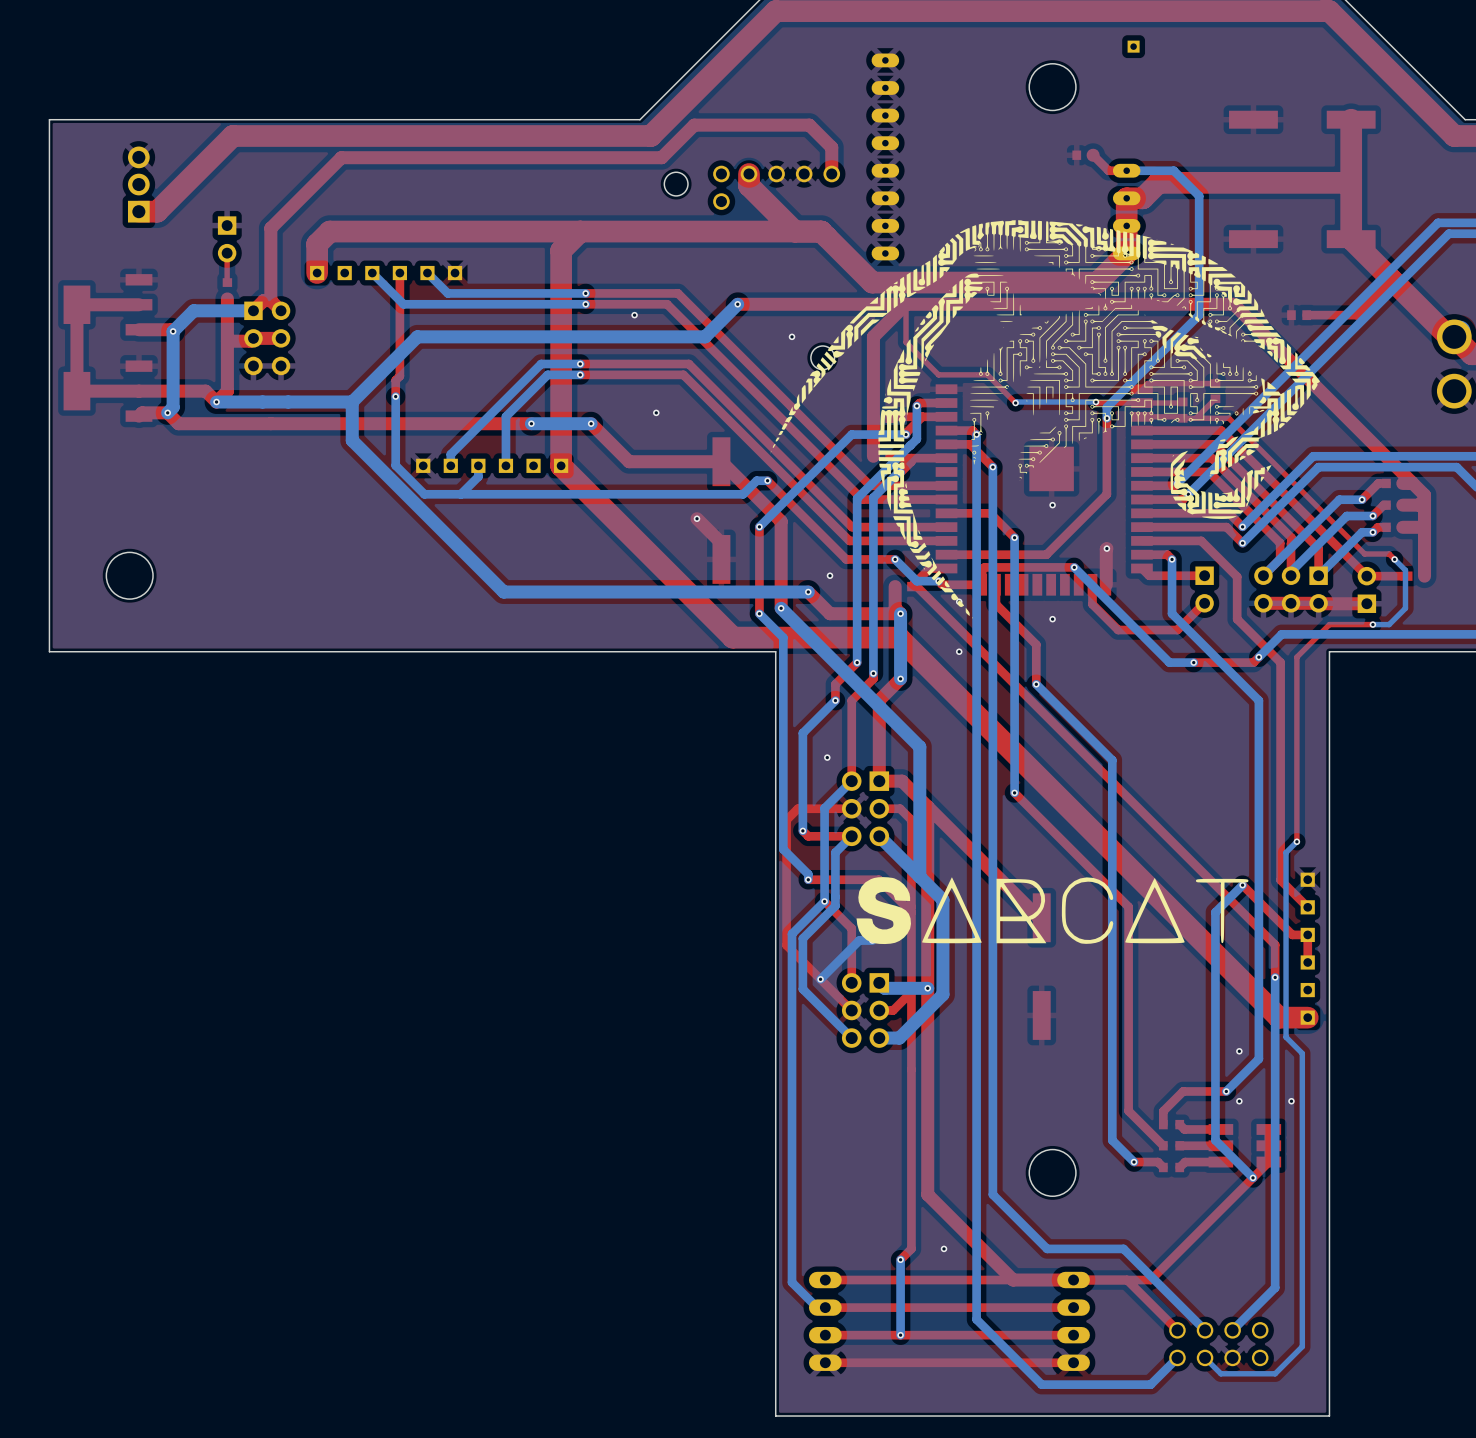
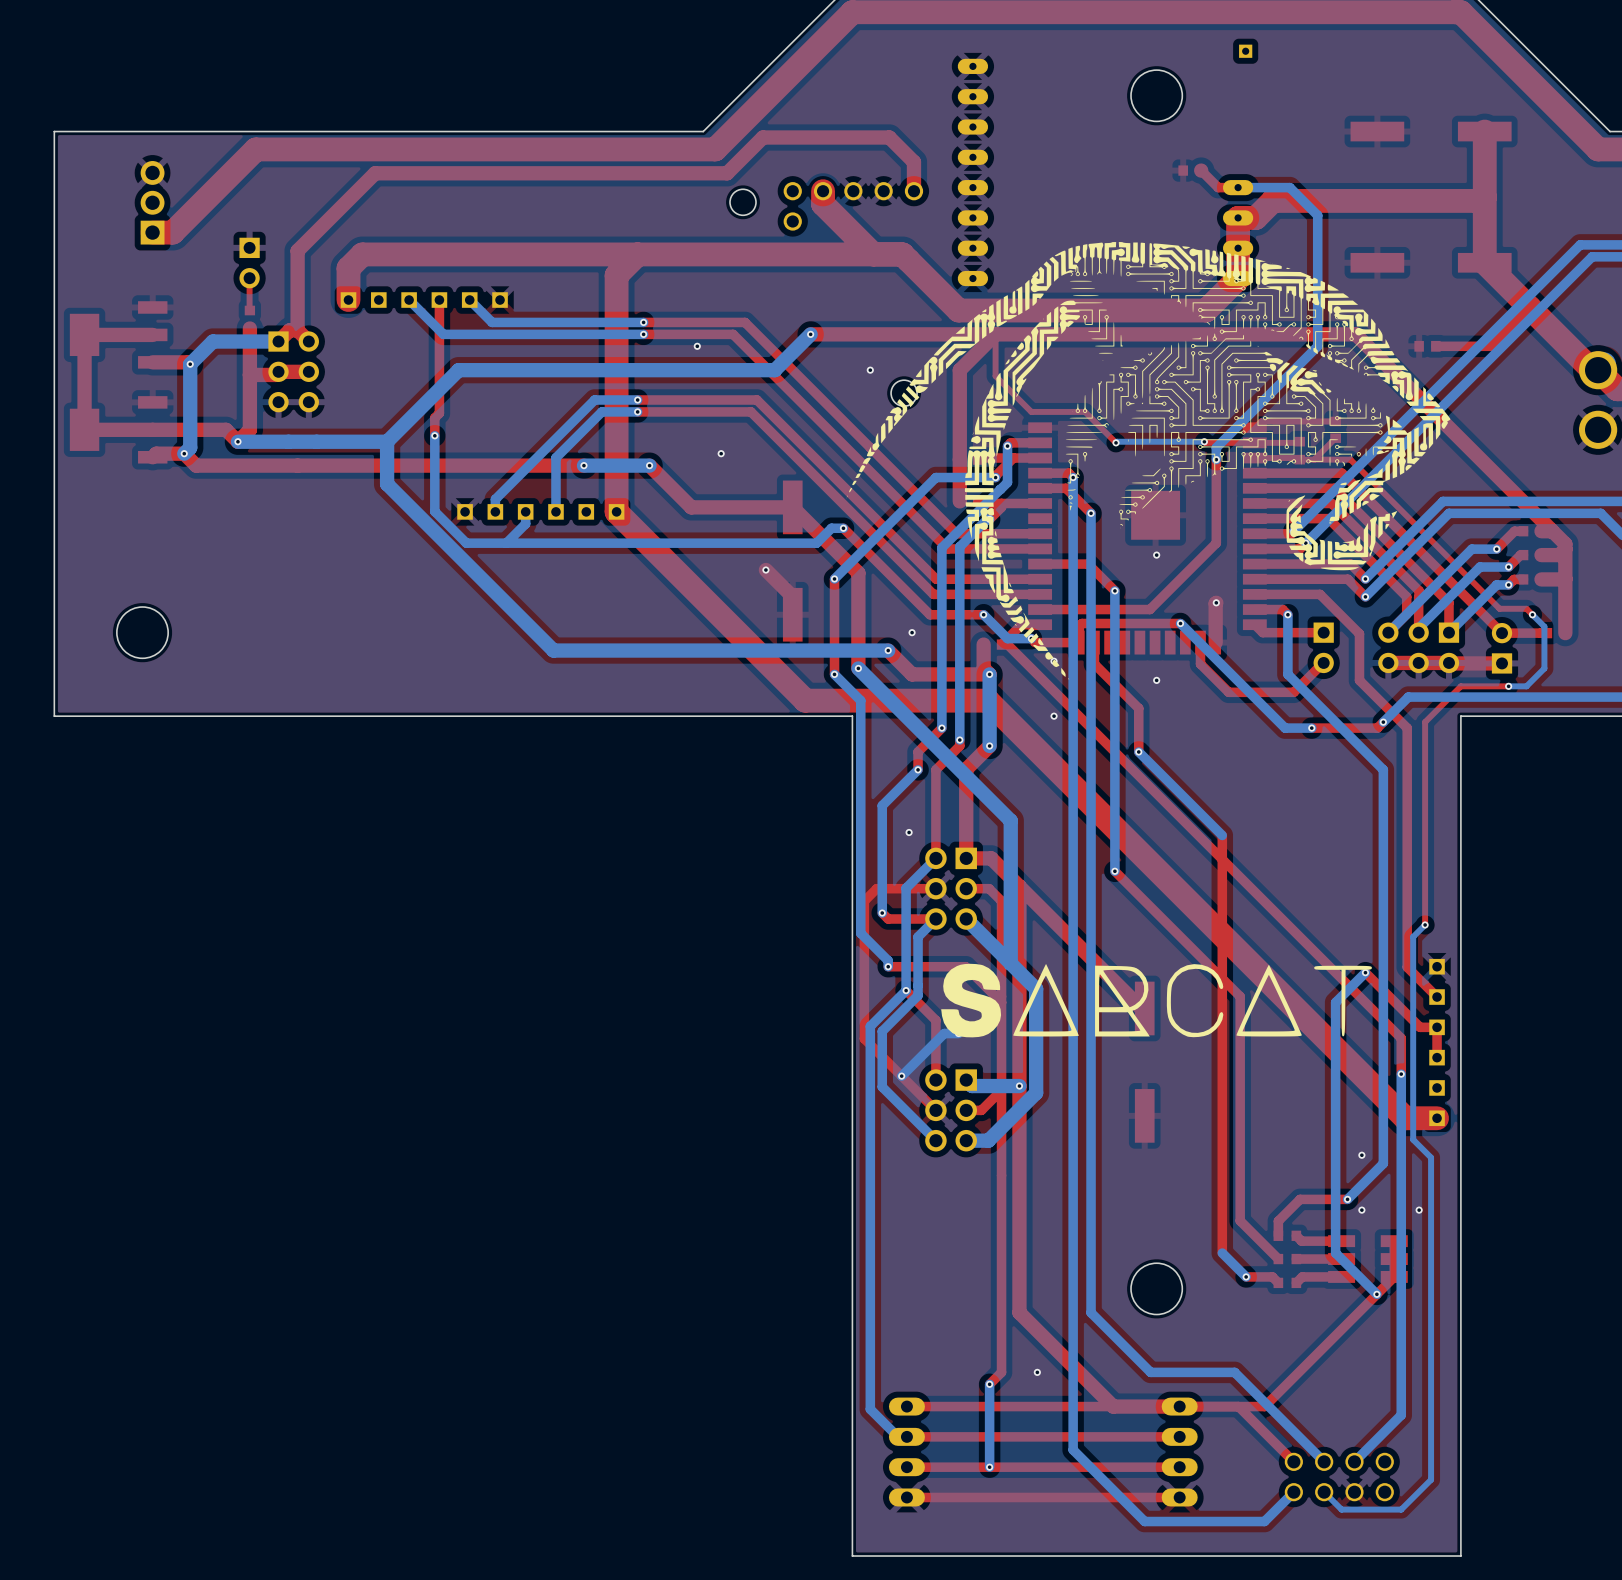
top track: none -> (1222, 835) (1222, 1253)
bottom track: (1112, 760) (1112, 1140) -> none

